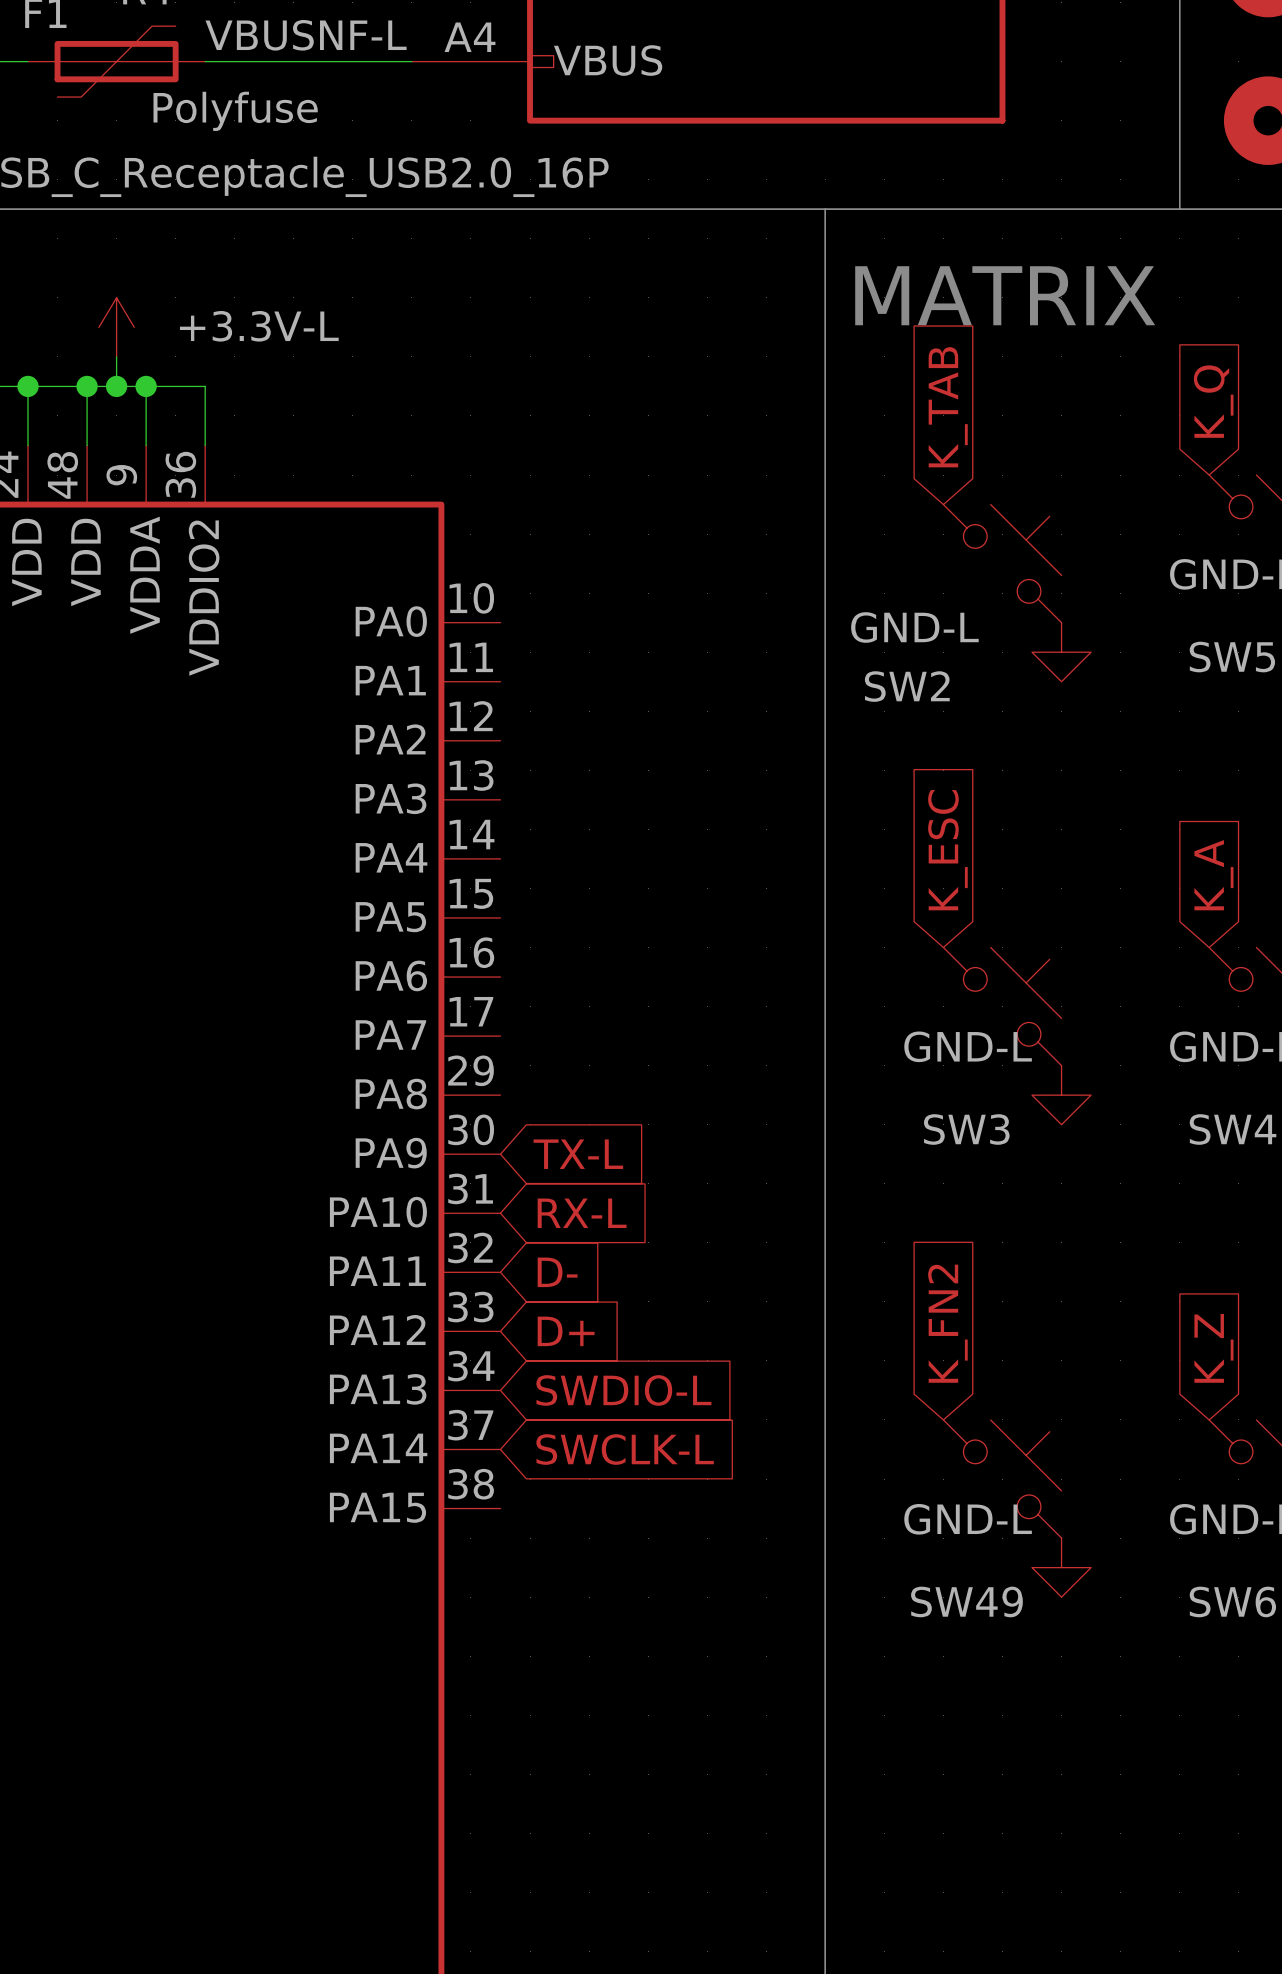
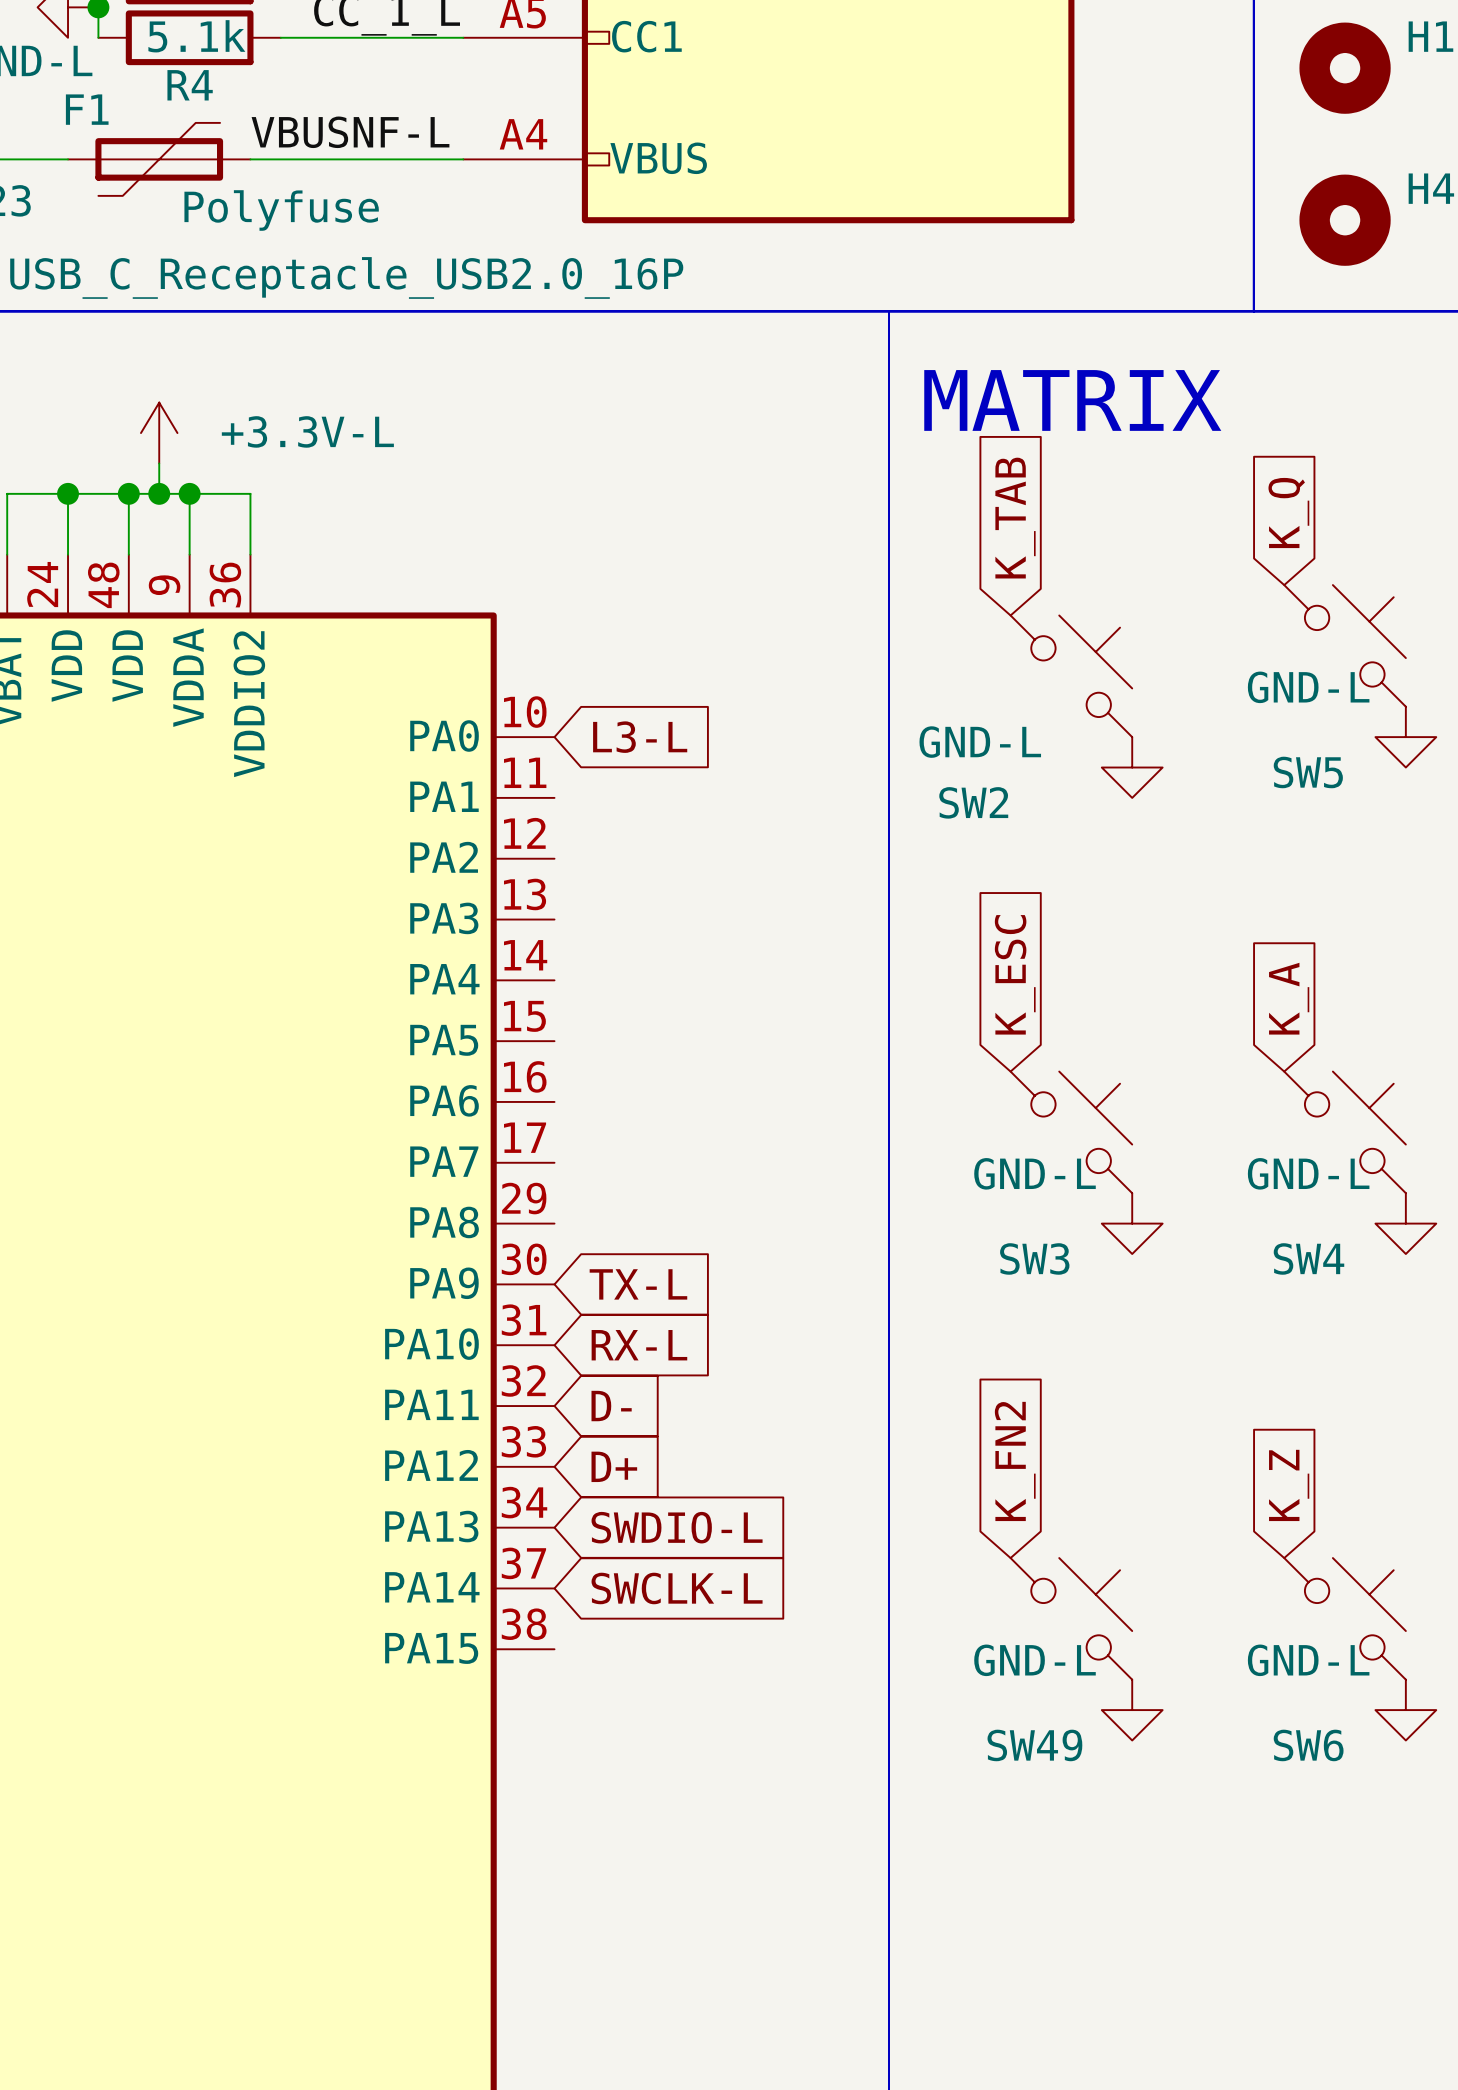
global label: none -> L3-L (640, 737)

